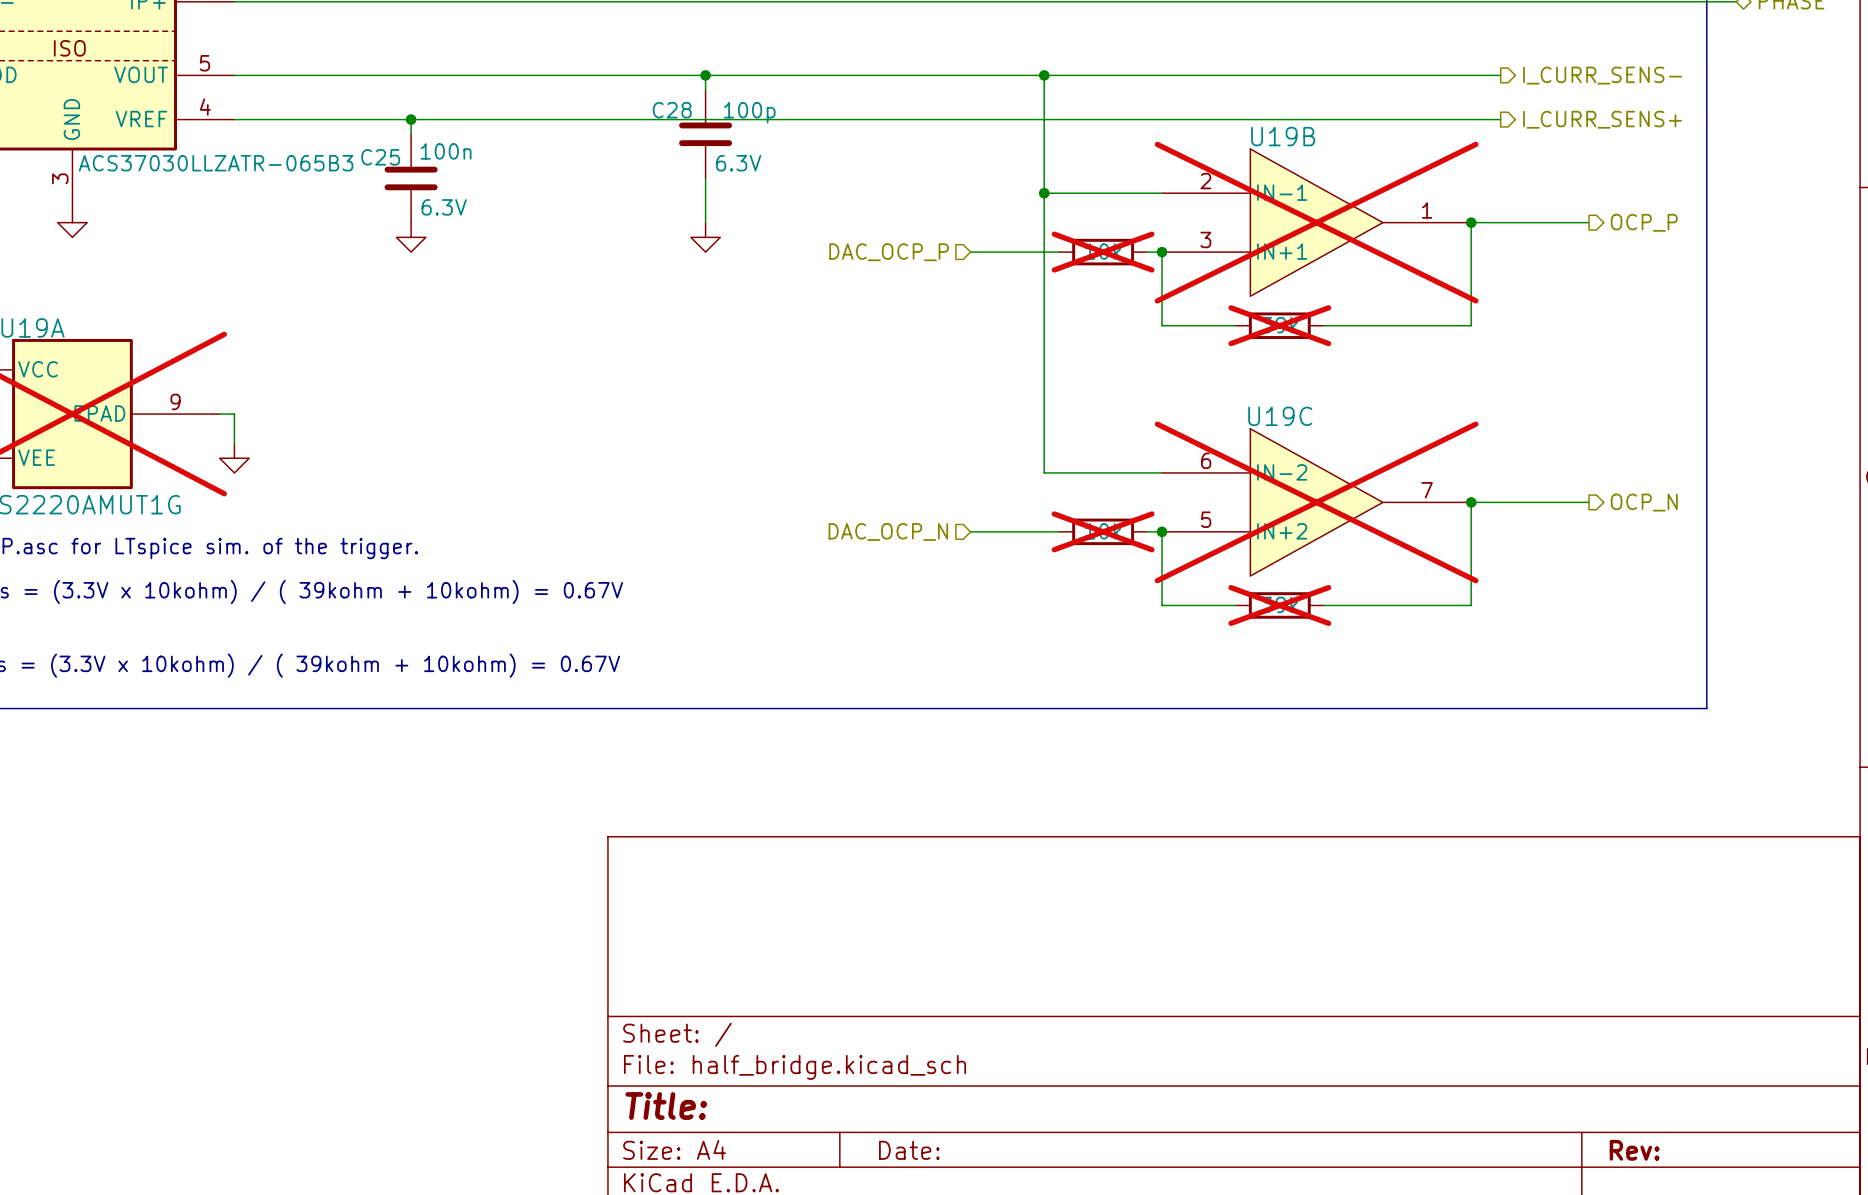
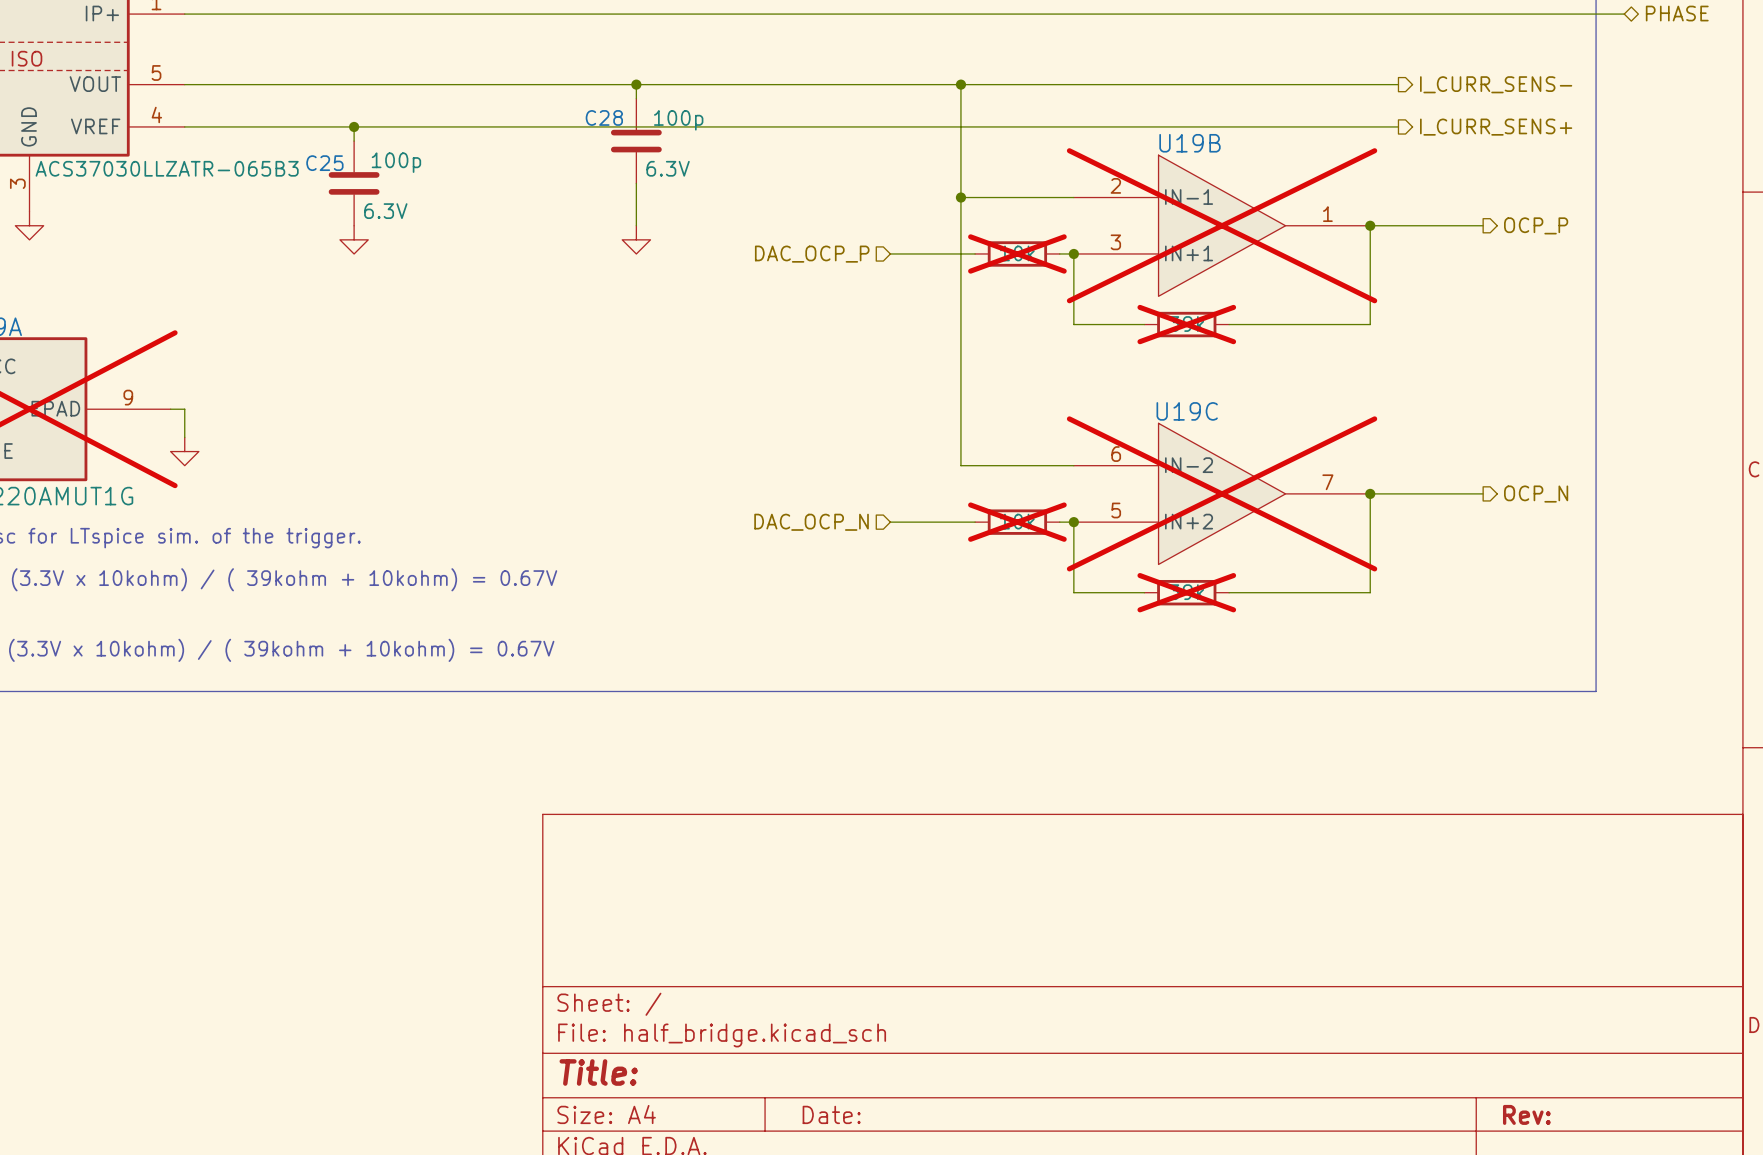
C25 text: 100n (446, 151) -> 100p (396, 162)

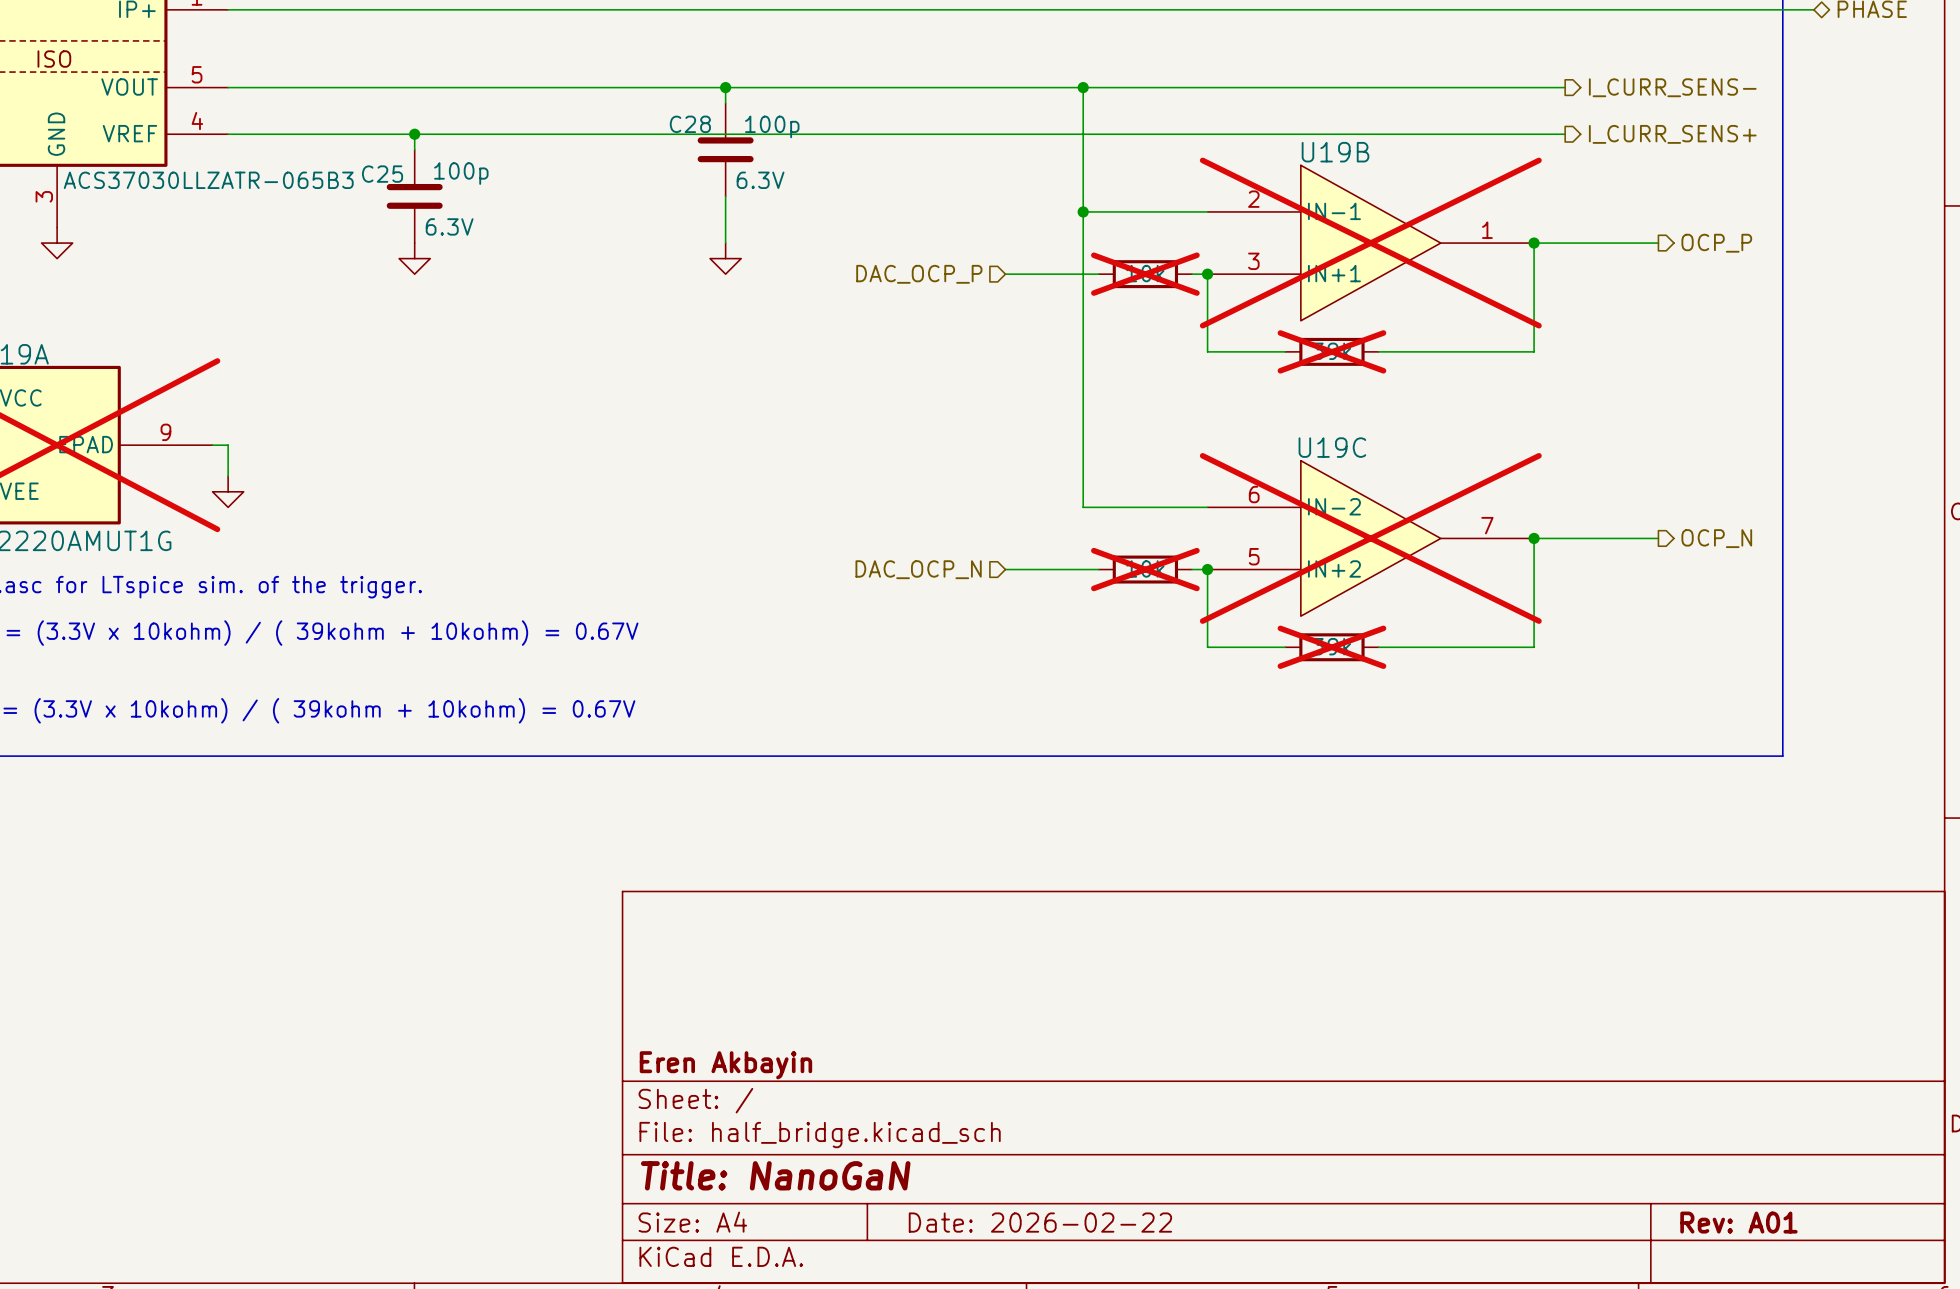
title block: none -> Eren Akbayin (725, 1065)
title block: Title: (598, 1072) -> Title: NanoGaN (775, 1175)
title block: Date: (831, 1114) -> Date: 2026-02-22 (1040, 1222)
title block: Rev: (1526, 1114) -> Rev: A01 (1738, 1222)

